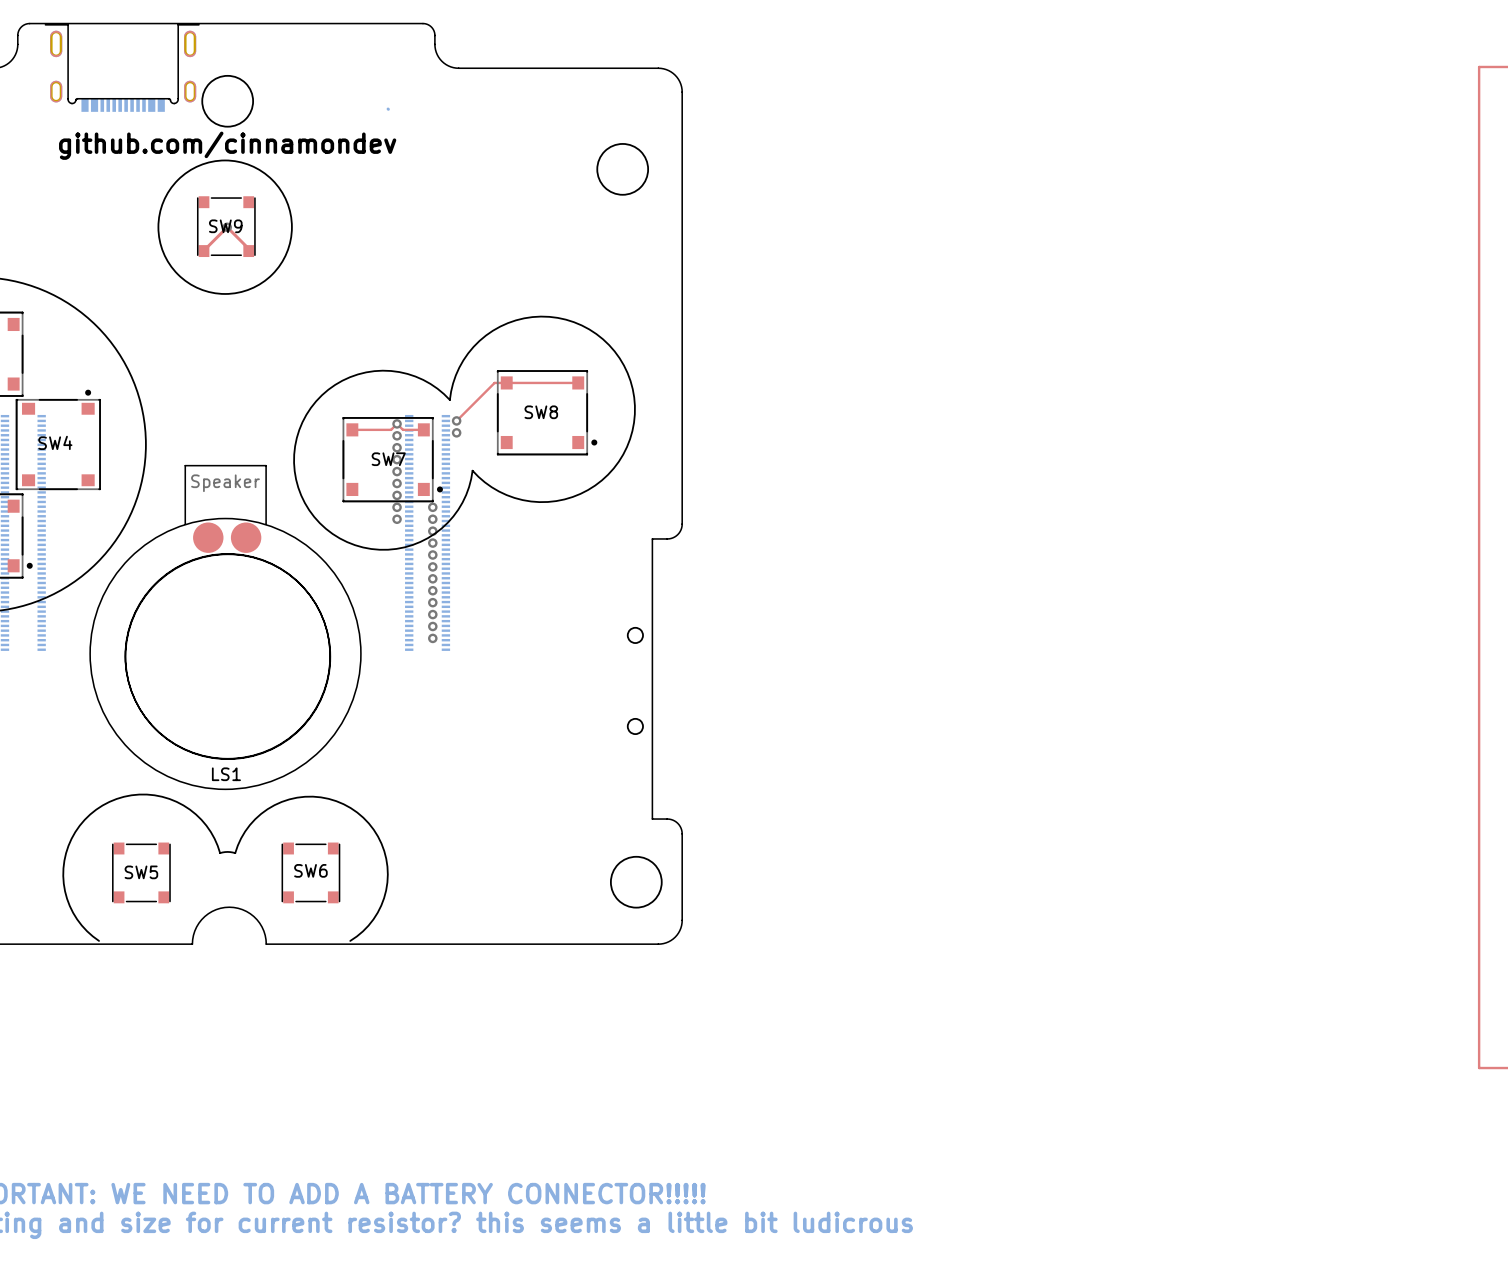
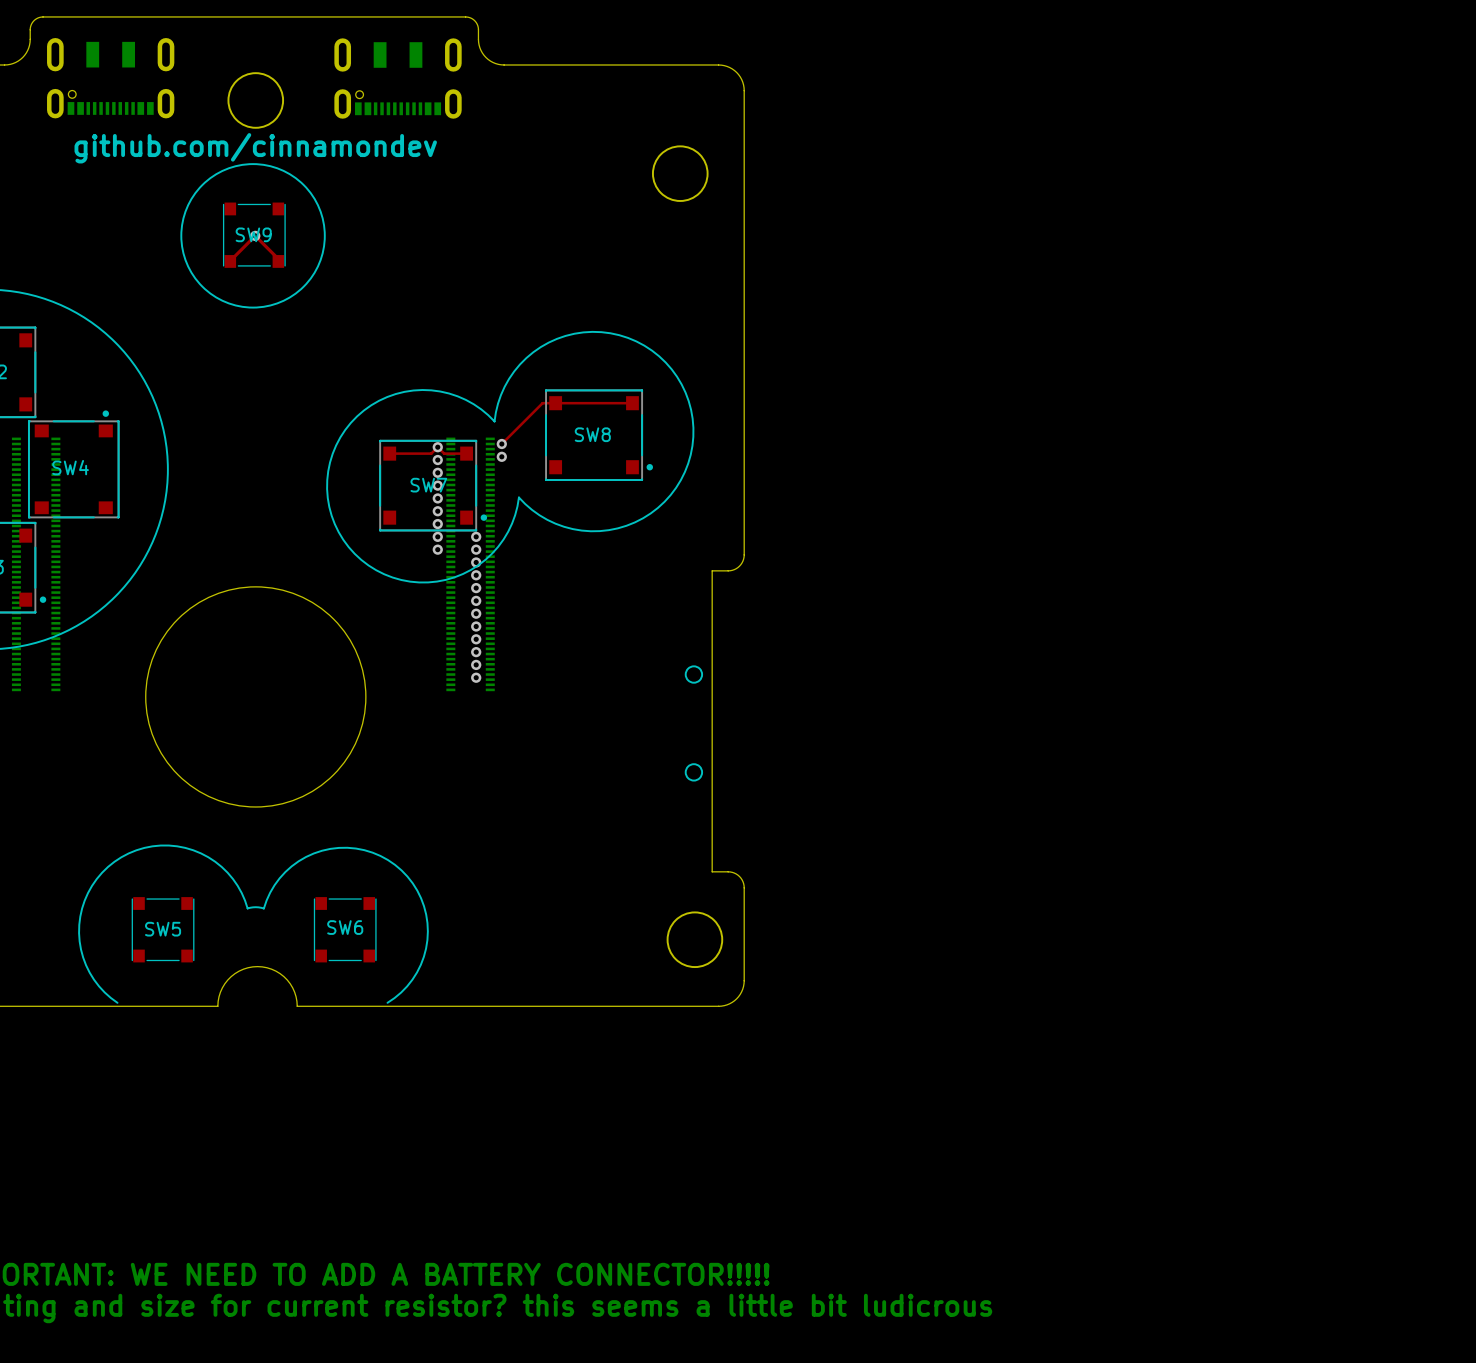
part: (122, 68) -> none
part: none -> (110, 78)
part: none -> (398, 78)
LS1: Speaker (225, 627) -> none

